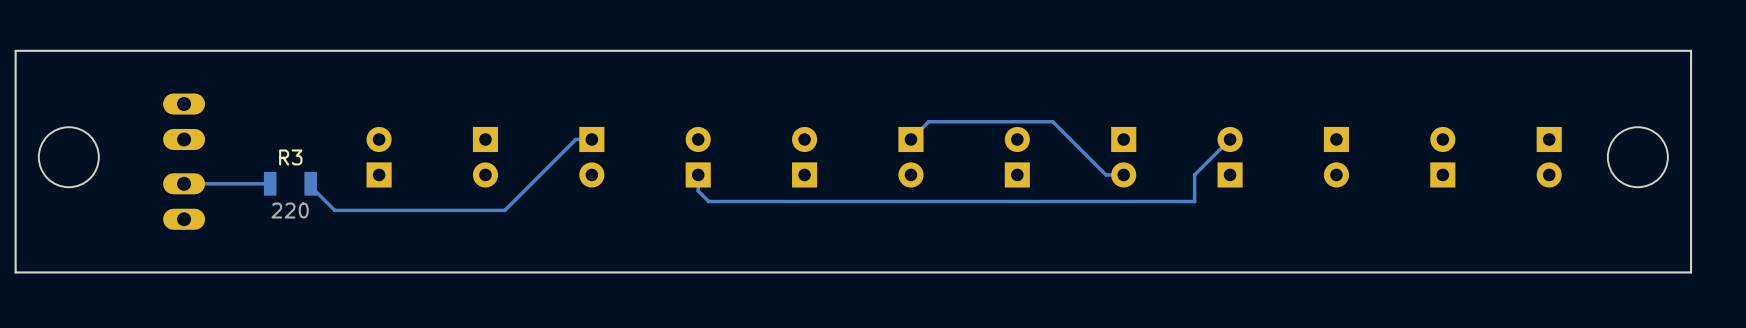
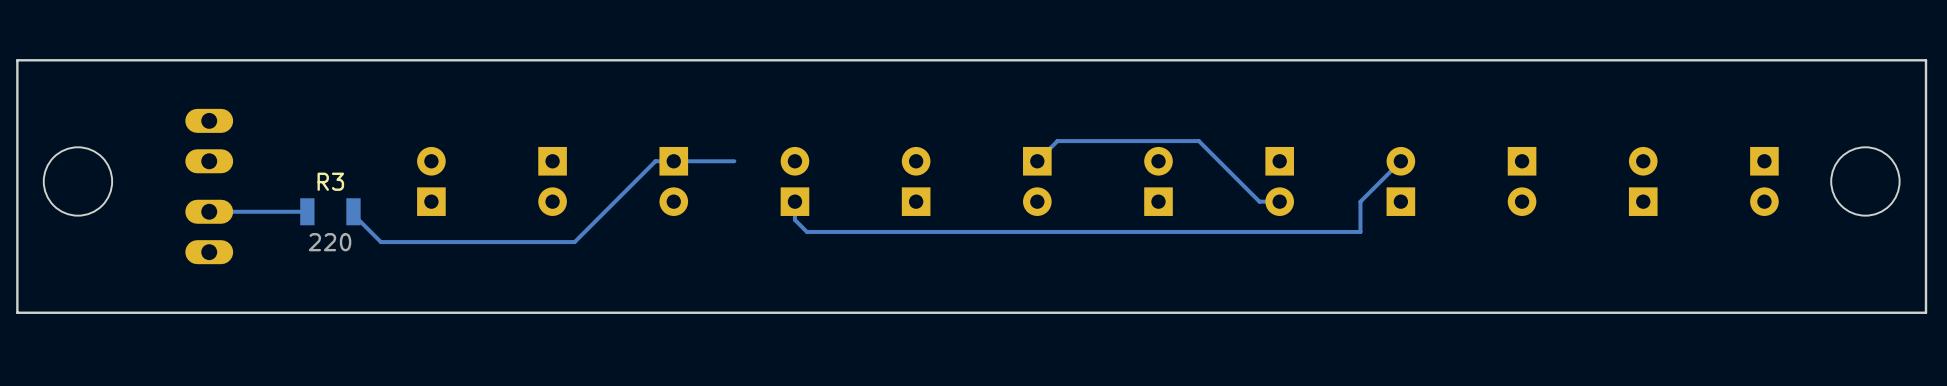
track: none -> (734, 161) (673, 161)

